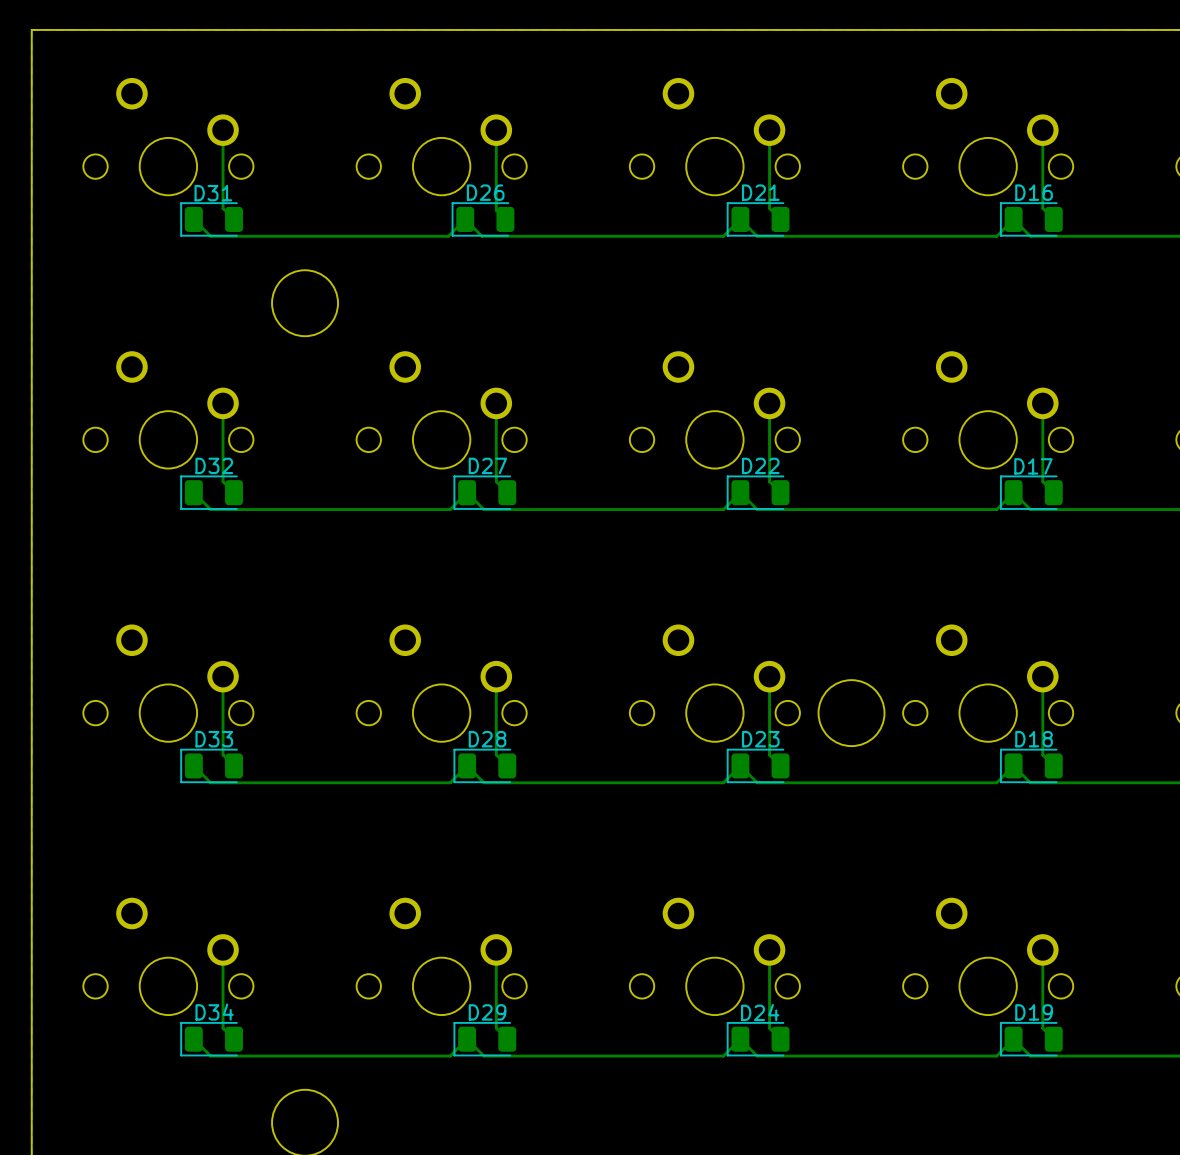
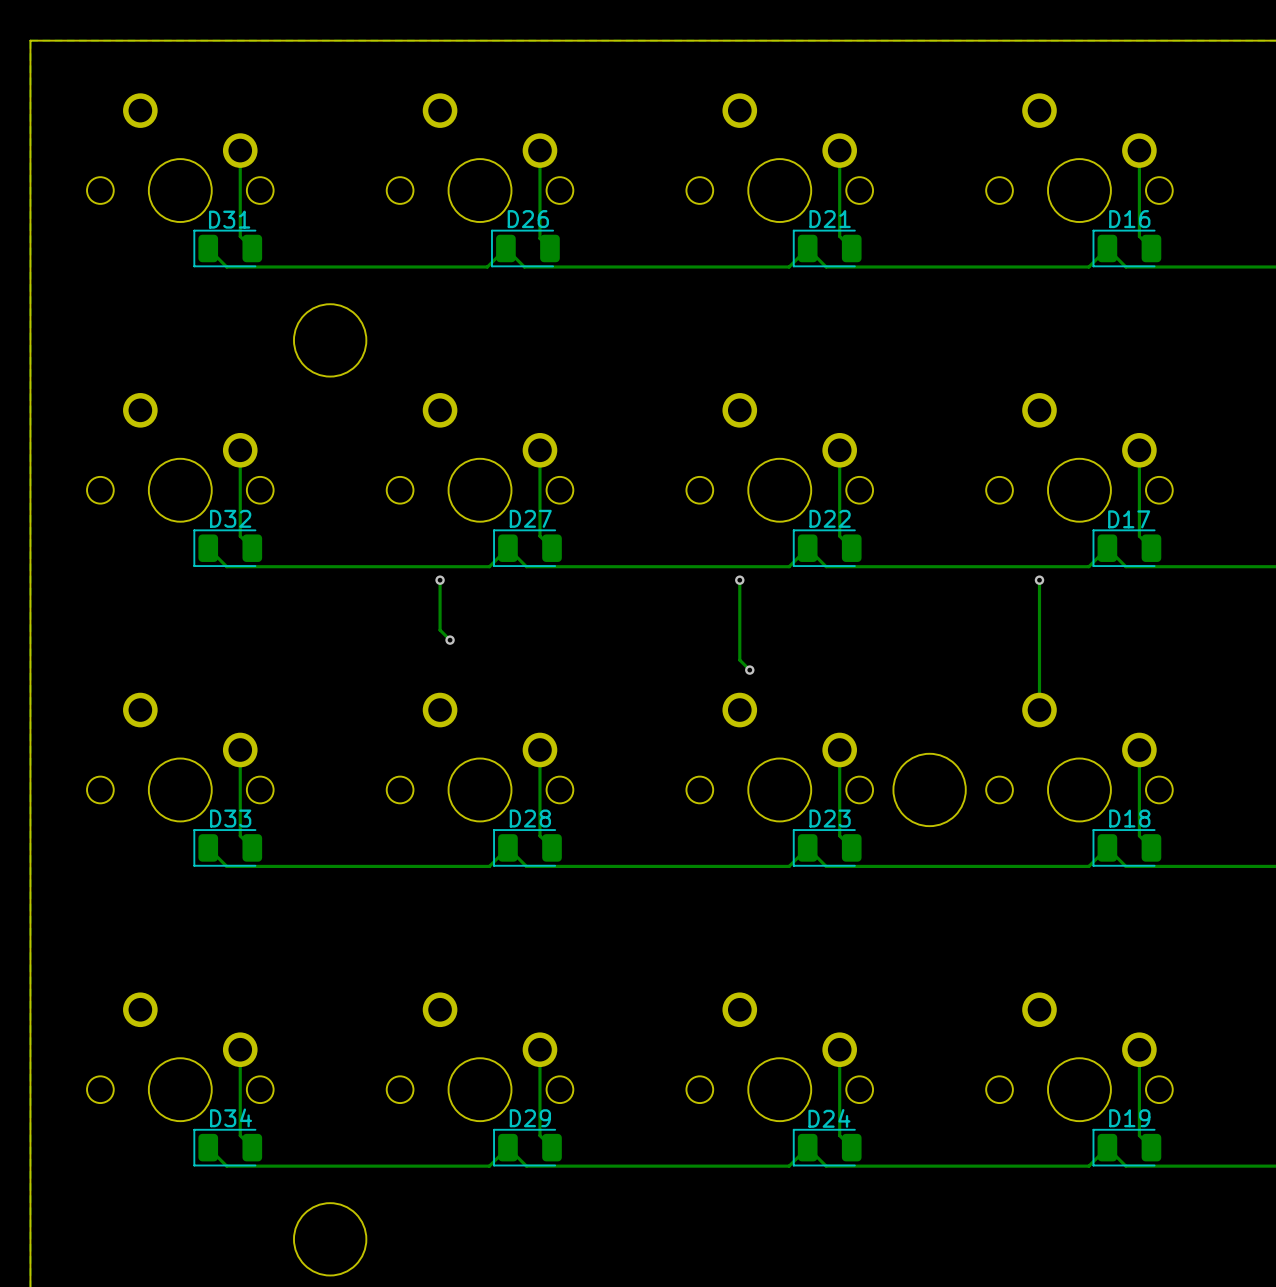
track: none -> (440, 580) (440, 630) (450, 640)
via: none -> (440, 580)
track: none -> (739, 580) (739, 660) (749, 670)
via: none -> (739, 580)
track: none -> (1039, 580) (1039, 710)
via: none -> (1039, 580)
via: none -> (450, 640)
via: none -> (749, 670)

